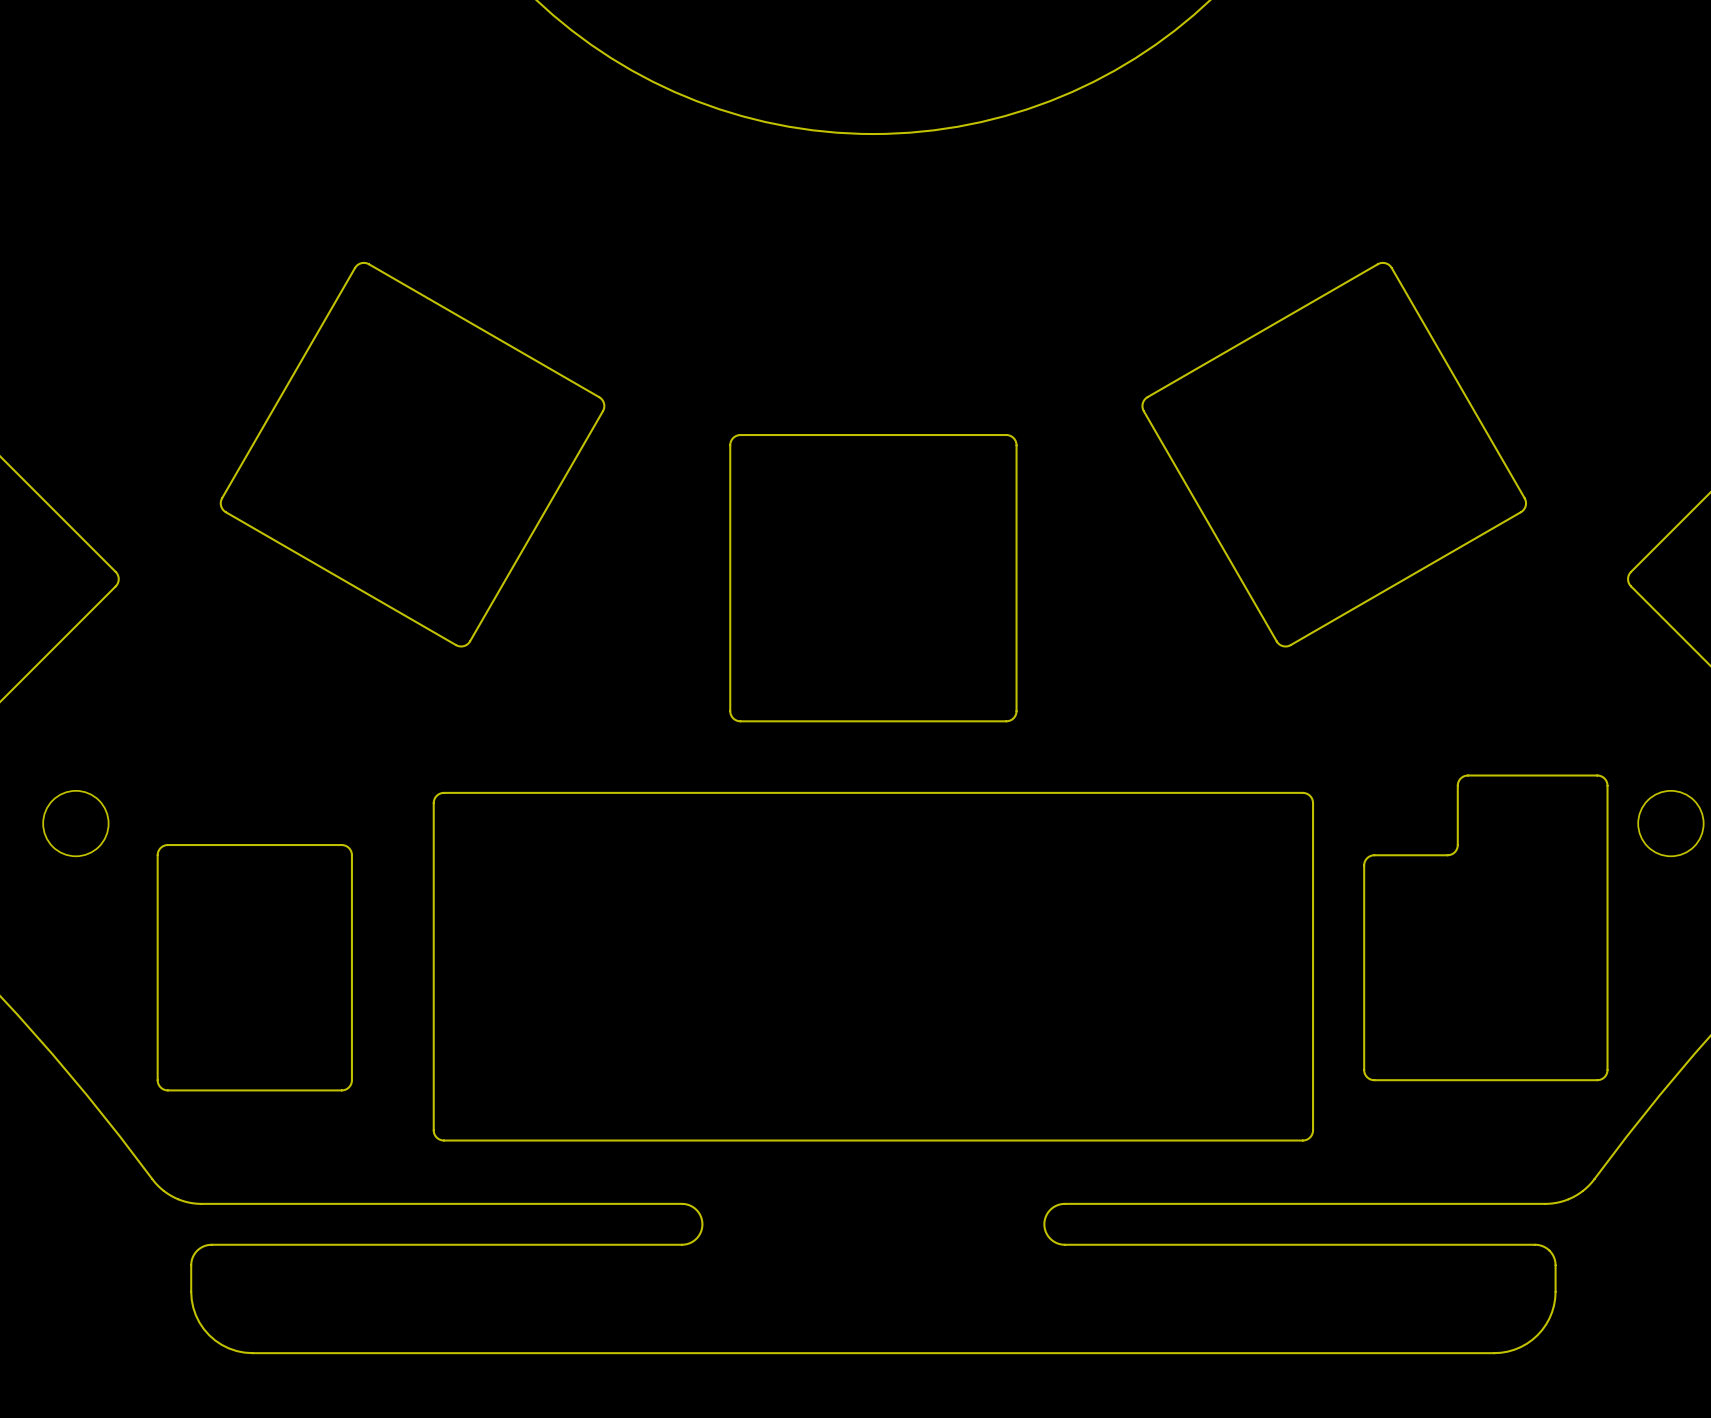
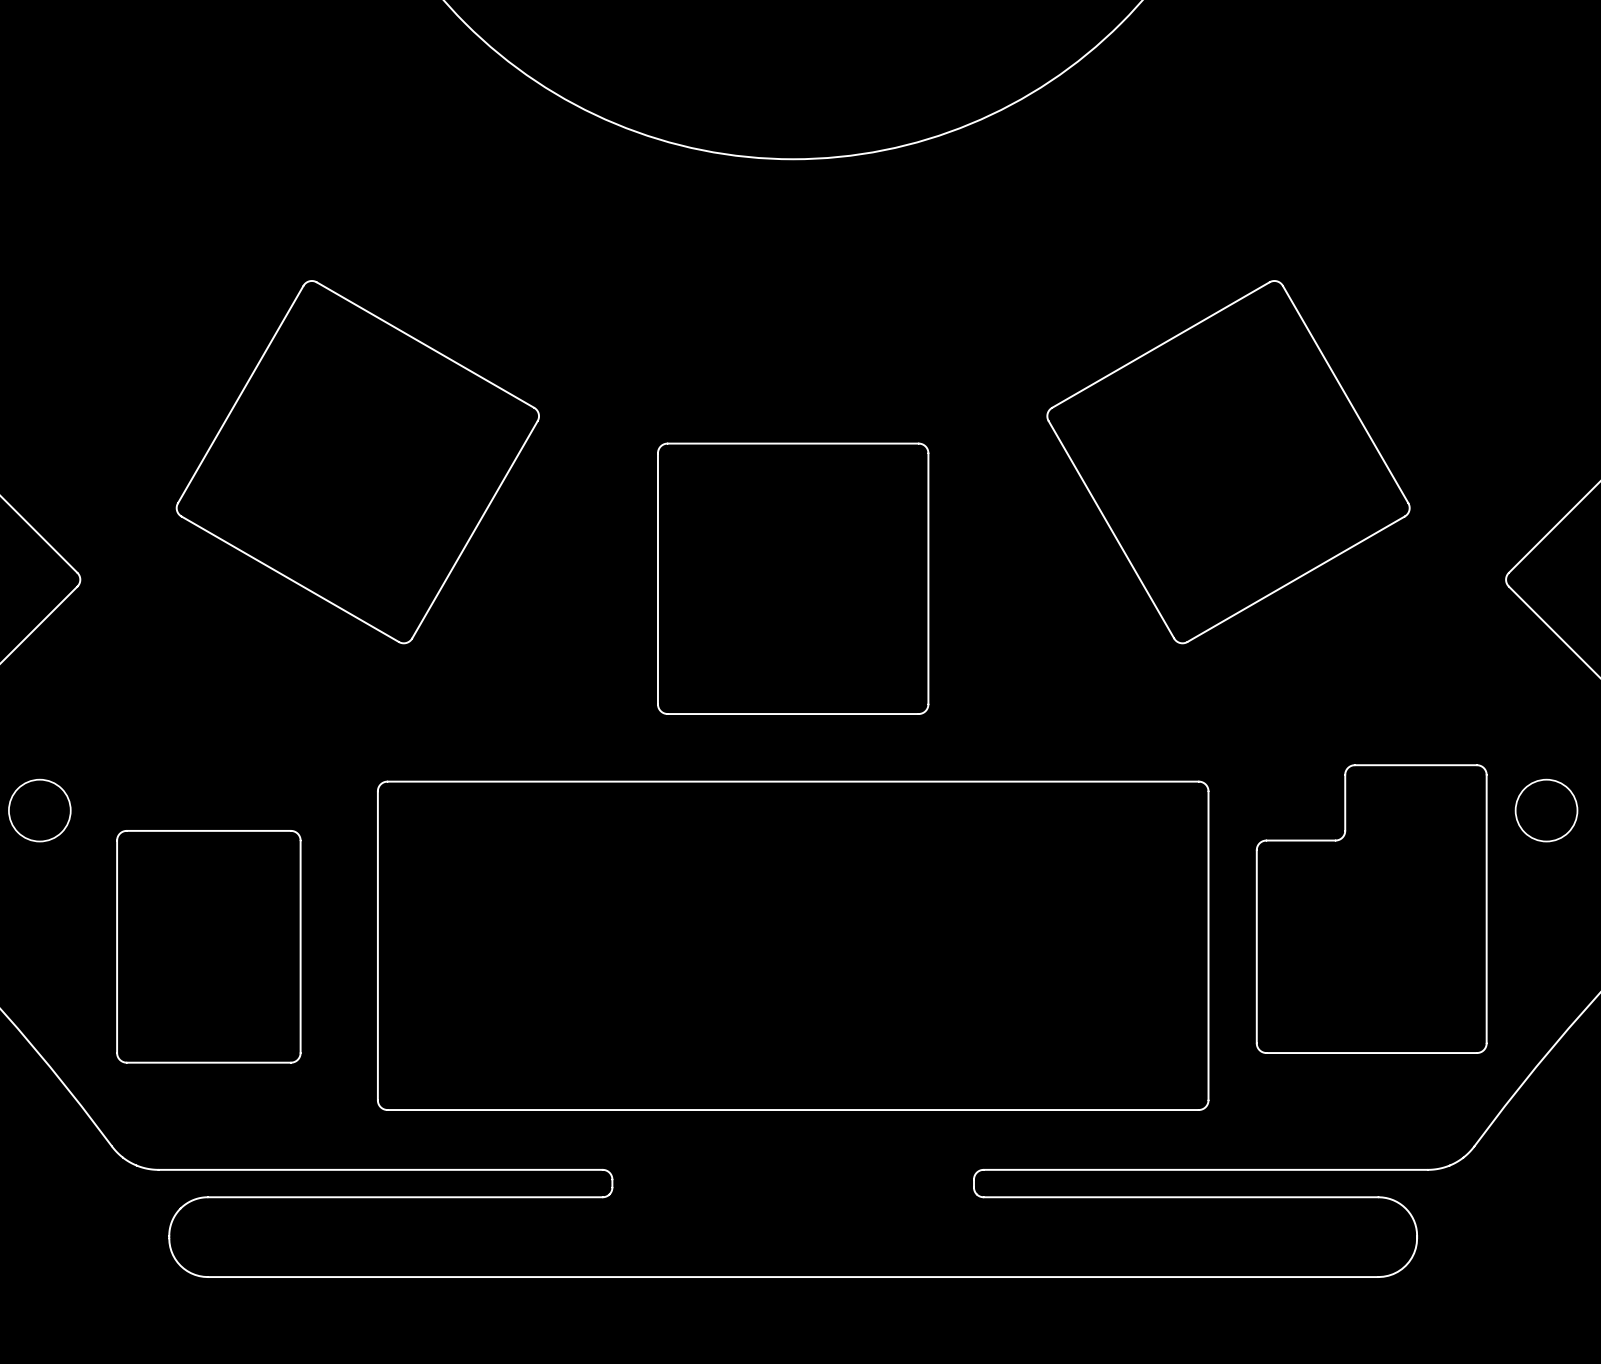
board edge: (671, 1203) (689, 1205) (700, 1214) (702, 1221) (701, 1231) (691, 1242) (681, 1244) (207, 1245) (197, 1250) (191, 1261) (191, 1291) (193, 1307) (199, 1322) (215, 1340) (236, 1351) (252, 1353) (1494, 1353) (1514, 1349) (1532, 1339) (1546, 1324) (1554, 1305) (1554, 1260) (1549, 1250) (1539, 1245) (1064, 1244) (1055, 1242) (1045, 1231) (1044, 1221) (1046, 1214) (1057, 1205) (1075, 1203) -> (602, 1169) (609, 1172) (612, 1179) (611, 1192) (603, 1197) (200, 1198) (184, 1204) (174, 1216) (169, 1230) (170, 1247) (175, 1258) (183, 1268) (195, 1274) (207, 1277) (1378, 1277) (1393, 1274) (1405, 1265) (1411, 1257) (1416, 1243) (1416, 1228) (1410, 1214) (1400, 1203) (1386, 1198) (983, 1197) (975, 1192) (974, 1179) (976, 1172) (983, 1169)

